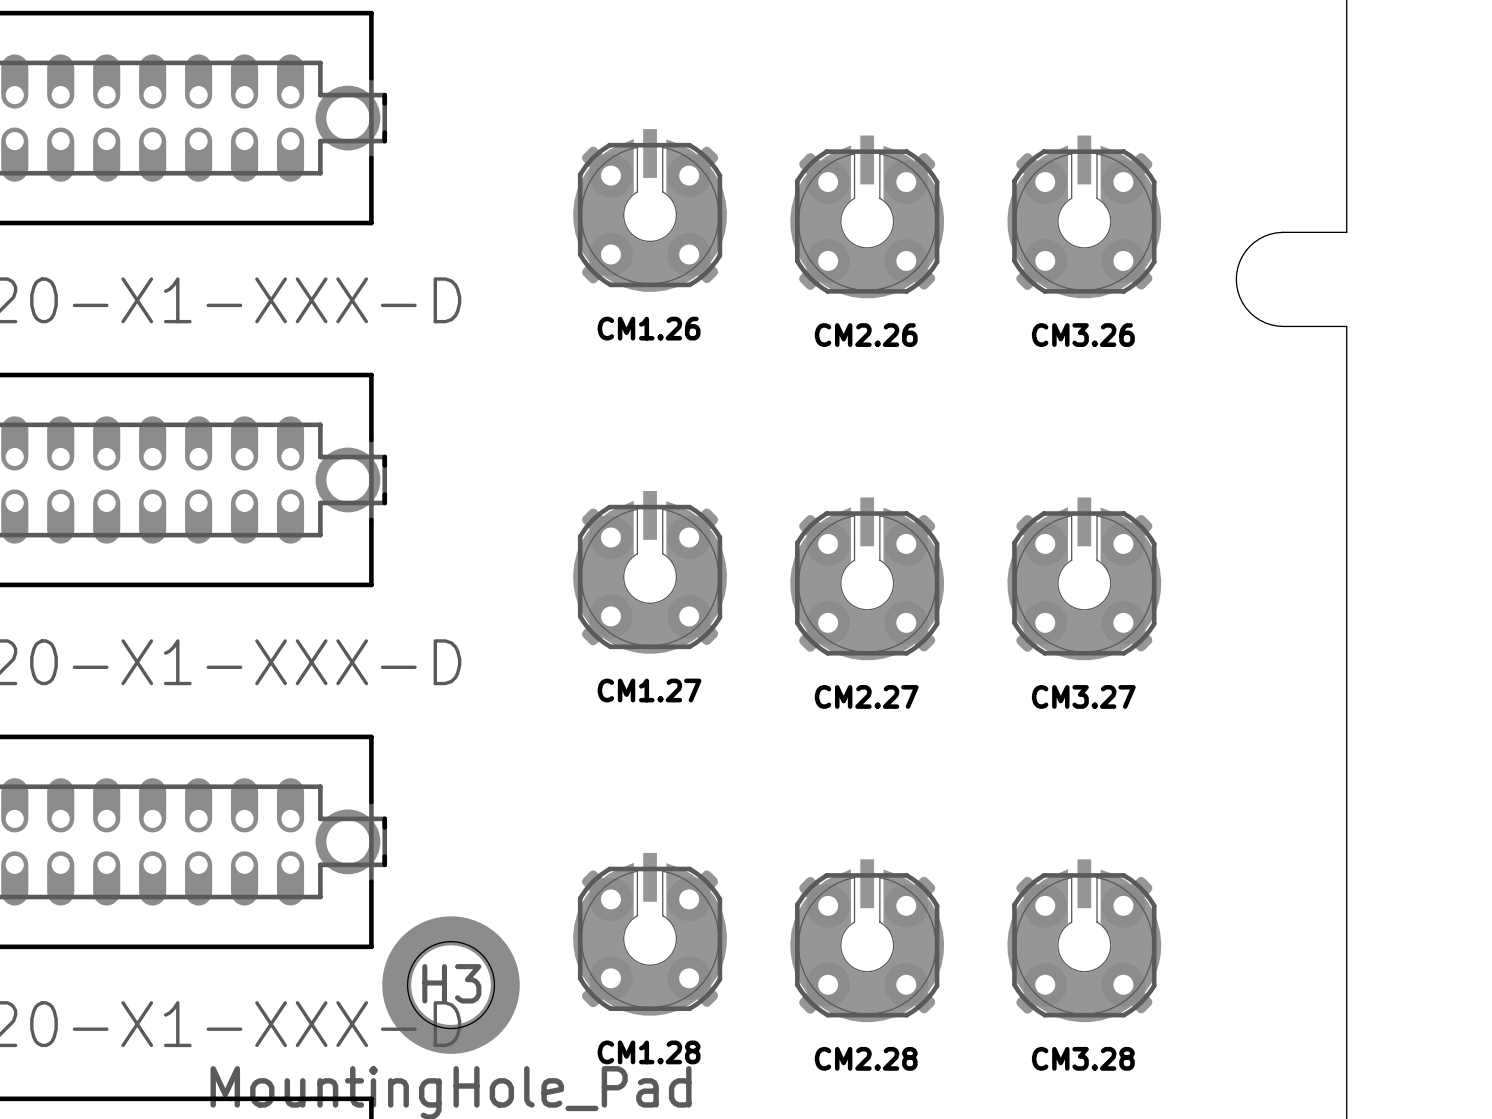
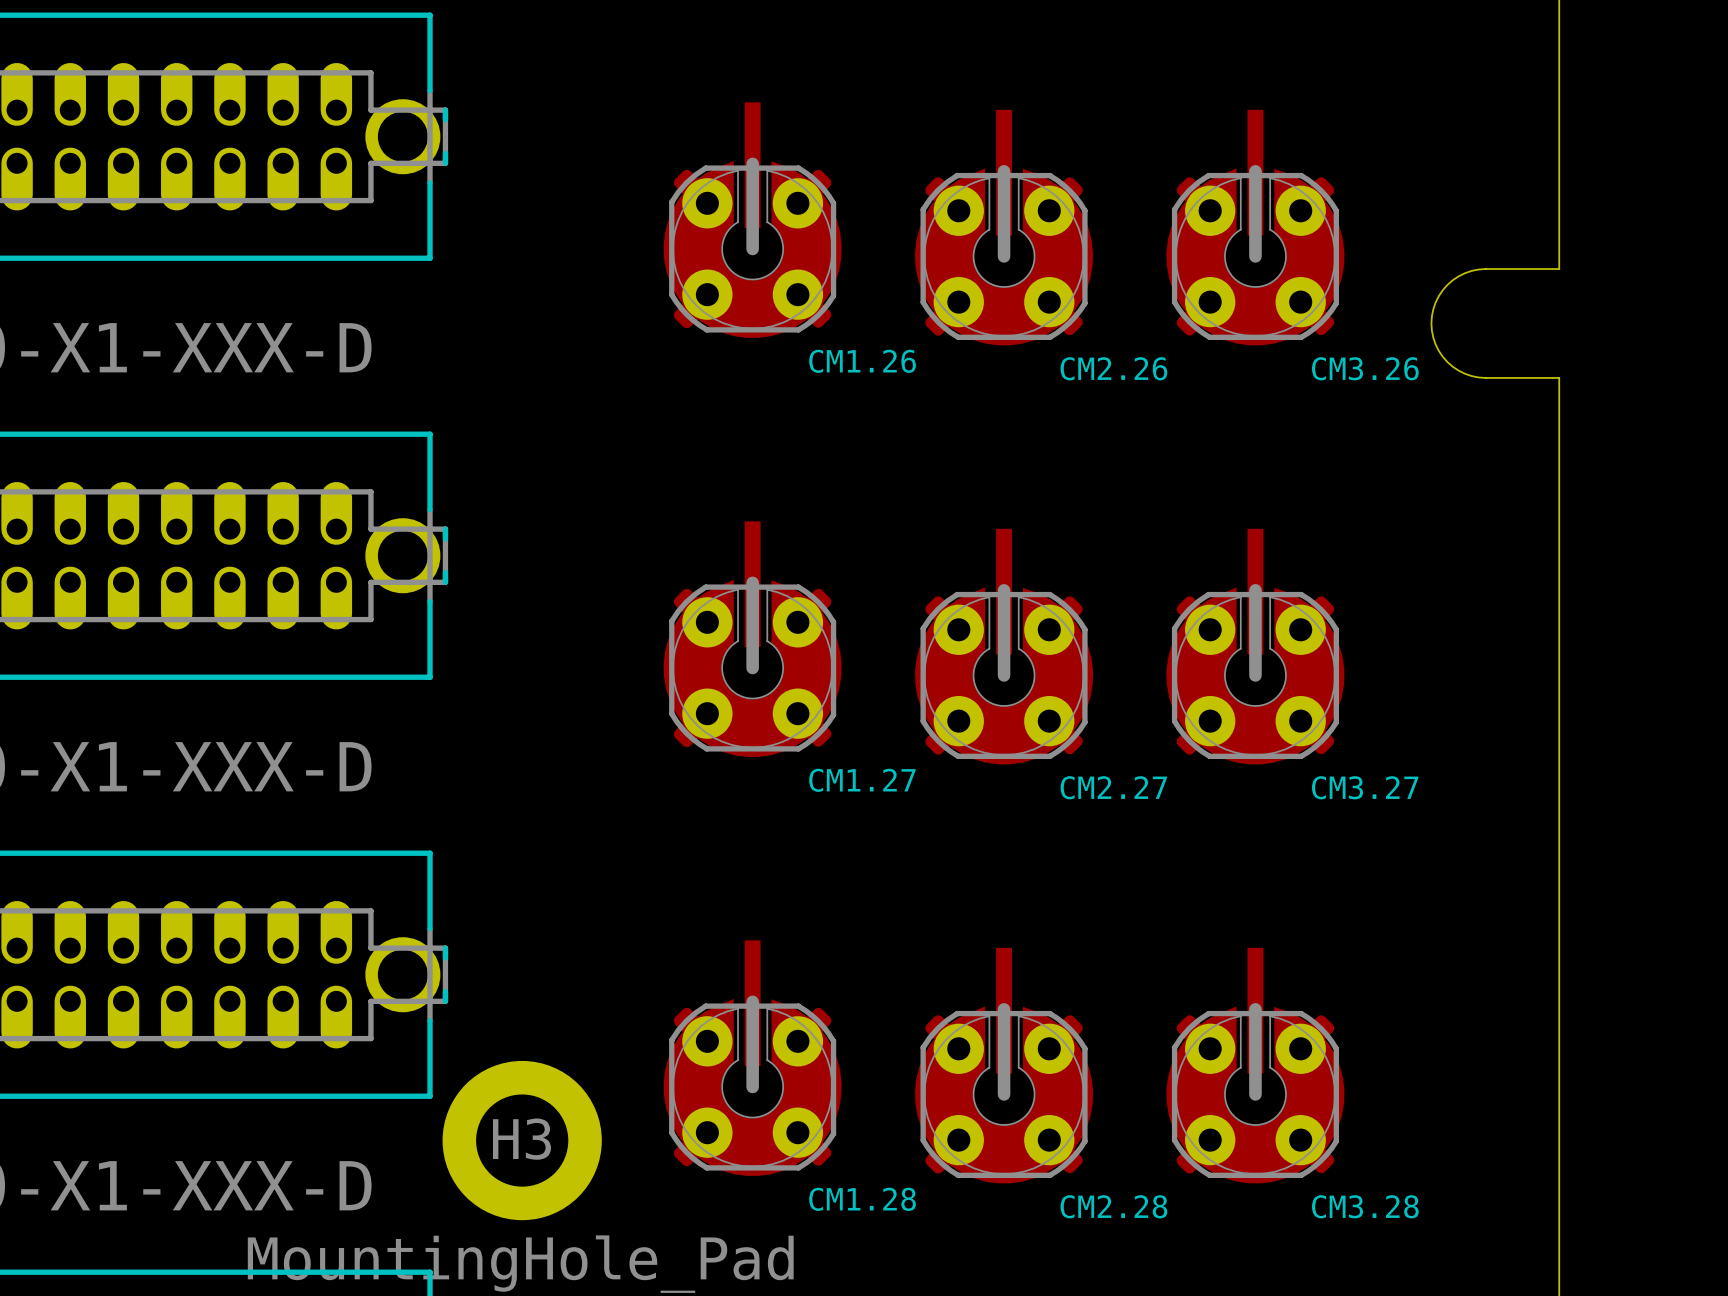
CM1.26 footprint: [573, 129, 727, 292] -> [663, 102, 842, 338]
CM2.26 footprint: [790, 135, 945, 299] -> [915, 109, 1094, 346]
CM3.26 footprint: [1007, 135, 1162, 299] -> [1166, 109, 1345, 346]
CM1.26 name position: CM1.26 (649, 328) -> CM1.26 (862, 361)
CM2.26 name position: CM2.26 (866, 335) -> CM2.26 (1113, 368)
CM3.26 name position: CM3.26 (1083, 335) -> CM3.26 (1365, 368)
CM1.27 footprint: [573, 491, 727, 654] -> [663, 521, 842, 757]
CM2.27 footprint: [790, 497, 945, 661] -> [915, 528, 1094, 765]
CM3.27 footprint: [1007, 497, 1162, 661] -> [1166, 528, 1345, 765]
CM1.27 name position: CM1.27 (649, 690) -> CM1.27 (862, 780)
CM2.27 name position: CM2.27 (866, 696) -> CM2.27 (1113, 787)
CM3.27 name position: CM3.27 (1083, 696) -> CM3.27 (1365, 787)
CM1.28 footprint: [573, 852, 727, 1016] -> [663, 940, 842, 1176]
CM2.28 footprint: [790, 859, 945, 1023] -> [915, 947, 1094, 1184]
CM3.28 footprint: [1007, 859, 1162, 1023] -> [1166, 947, 1345, 1184]
CM1.28 name position: CM1.28 (649, 1052) -> CM1.28 (862, 1199)
CM2.28 name position: CM2.28 (866, 1058) -> CM2.28 (1113, 1206)
CM3.28 name position: CM3.28 (1083, 1058) -> CM3.28 (1365, 1206)

